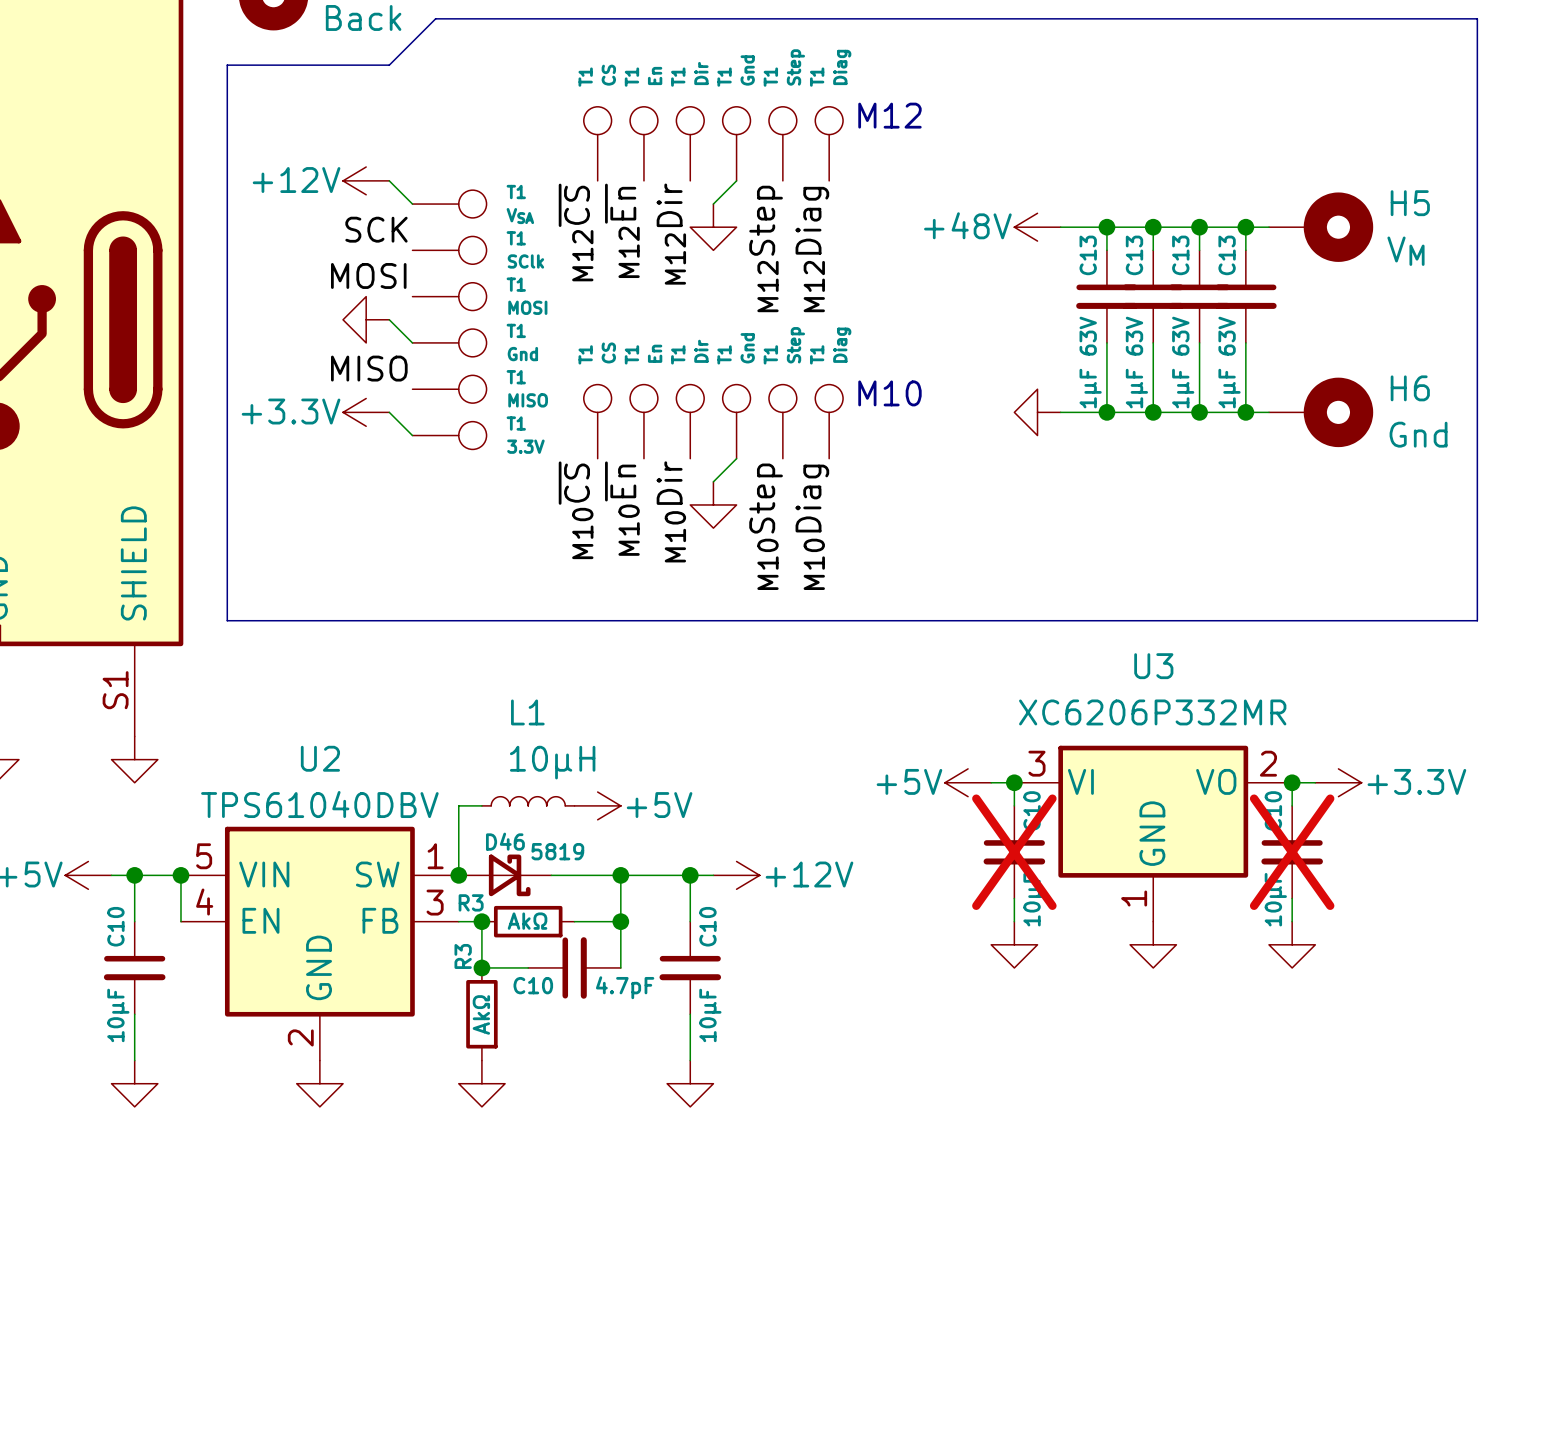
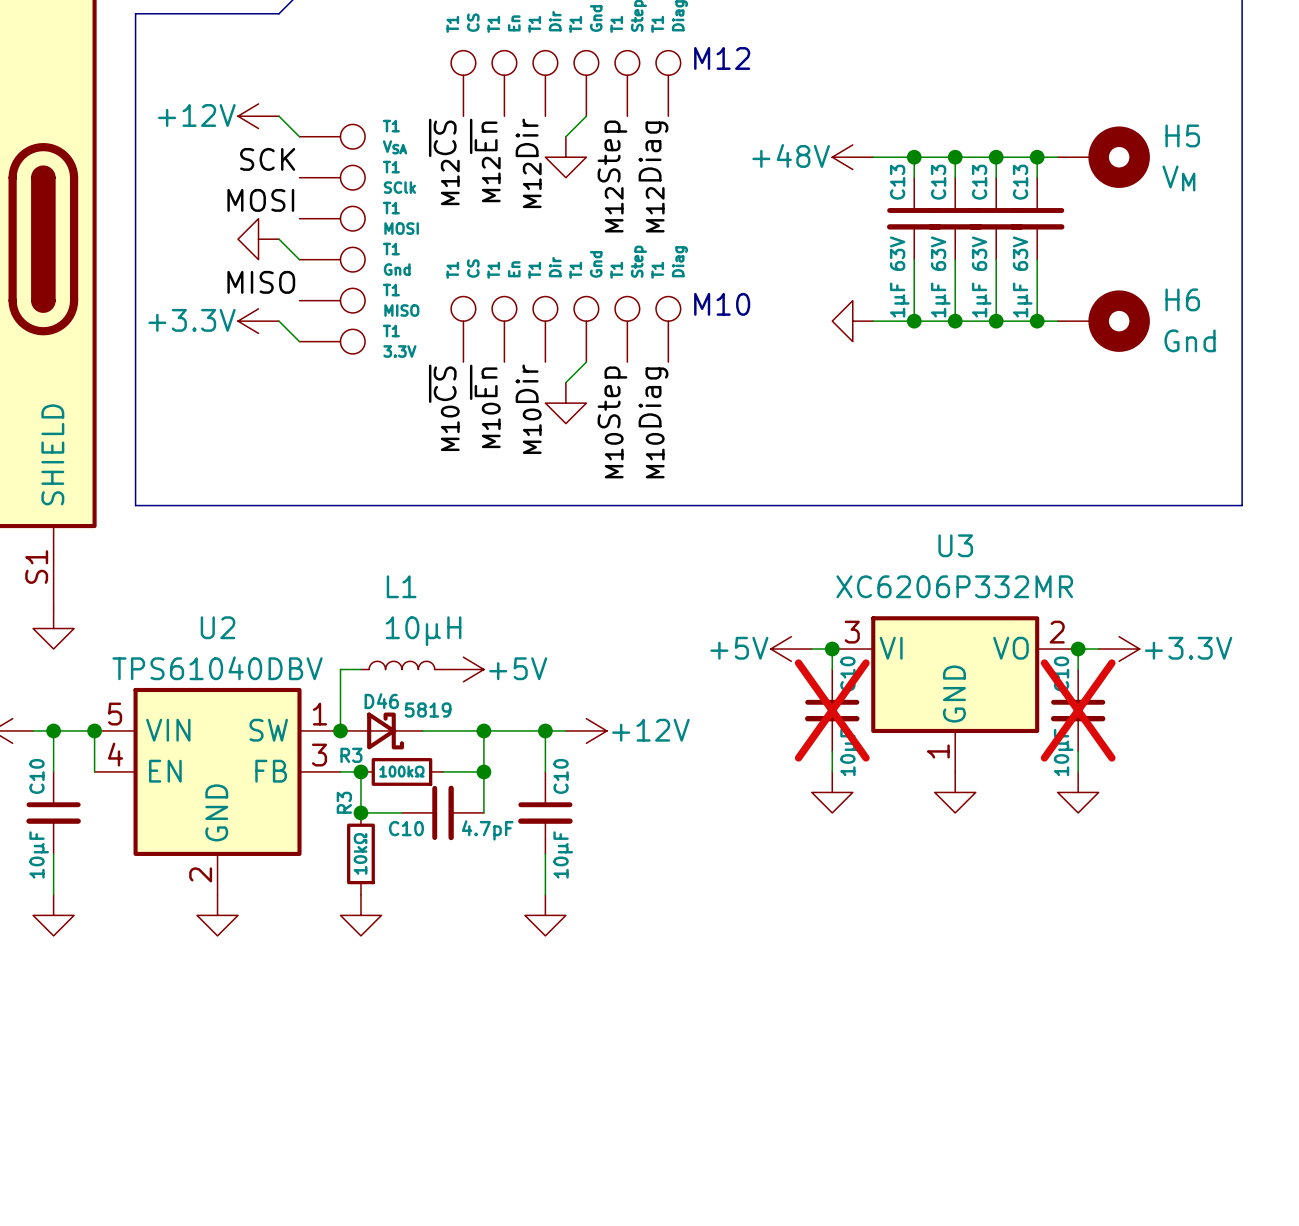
R3 value: AkΩ (527, 921) -> 100kΩ (401, 771)
R3 value: AkΩ (481, 1014) -> 10kΩ (360, 853)

